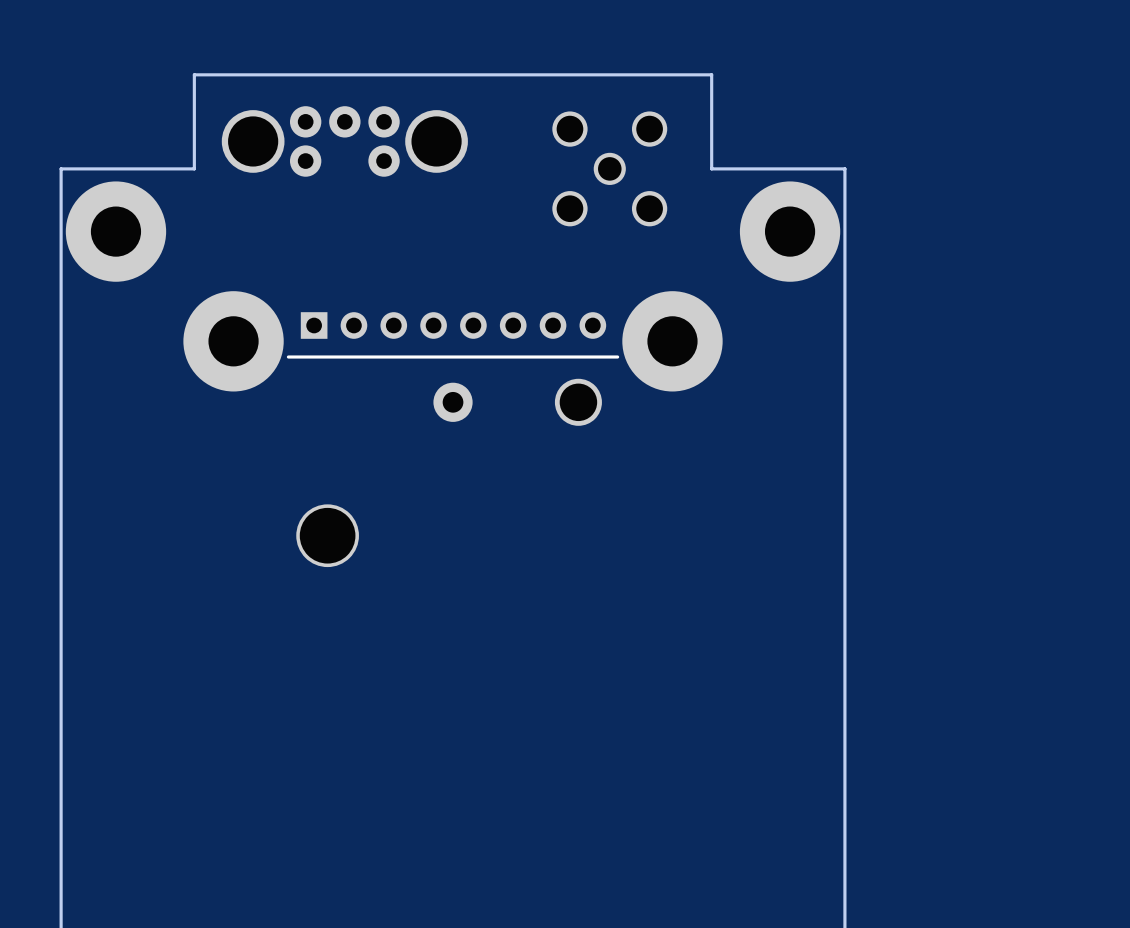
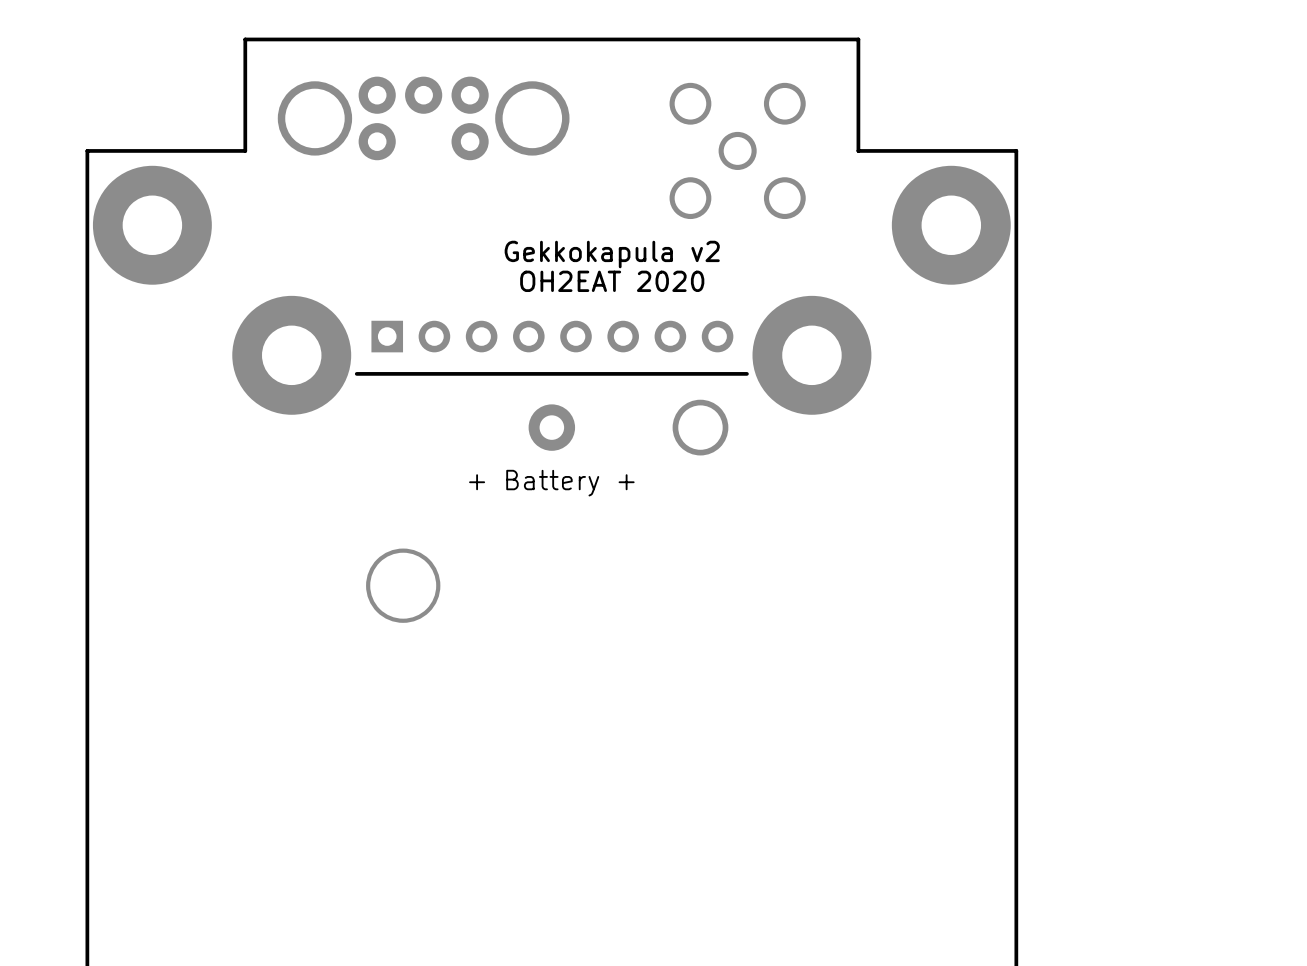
text: none -> Gekkokapula v2 (612, 254)
text: none -> OH2EAT 2020 (612, 281)
text: none -> + Battery + (551, 483)

